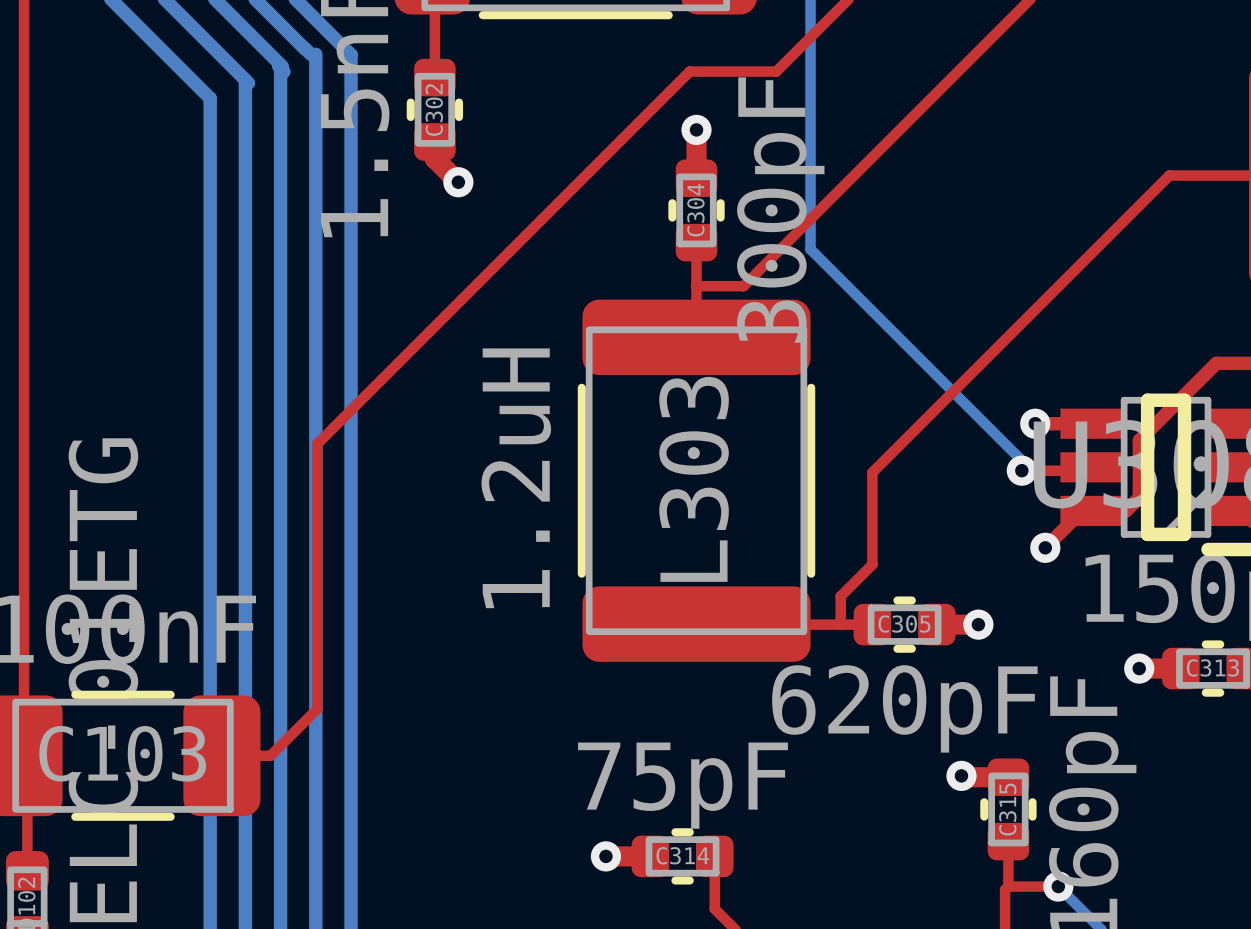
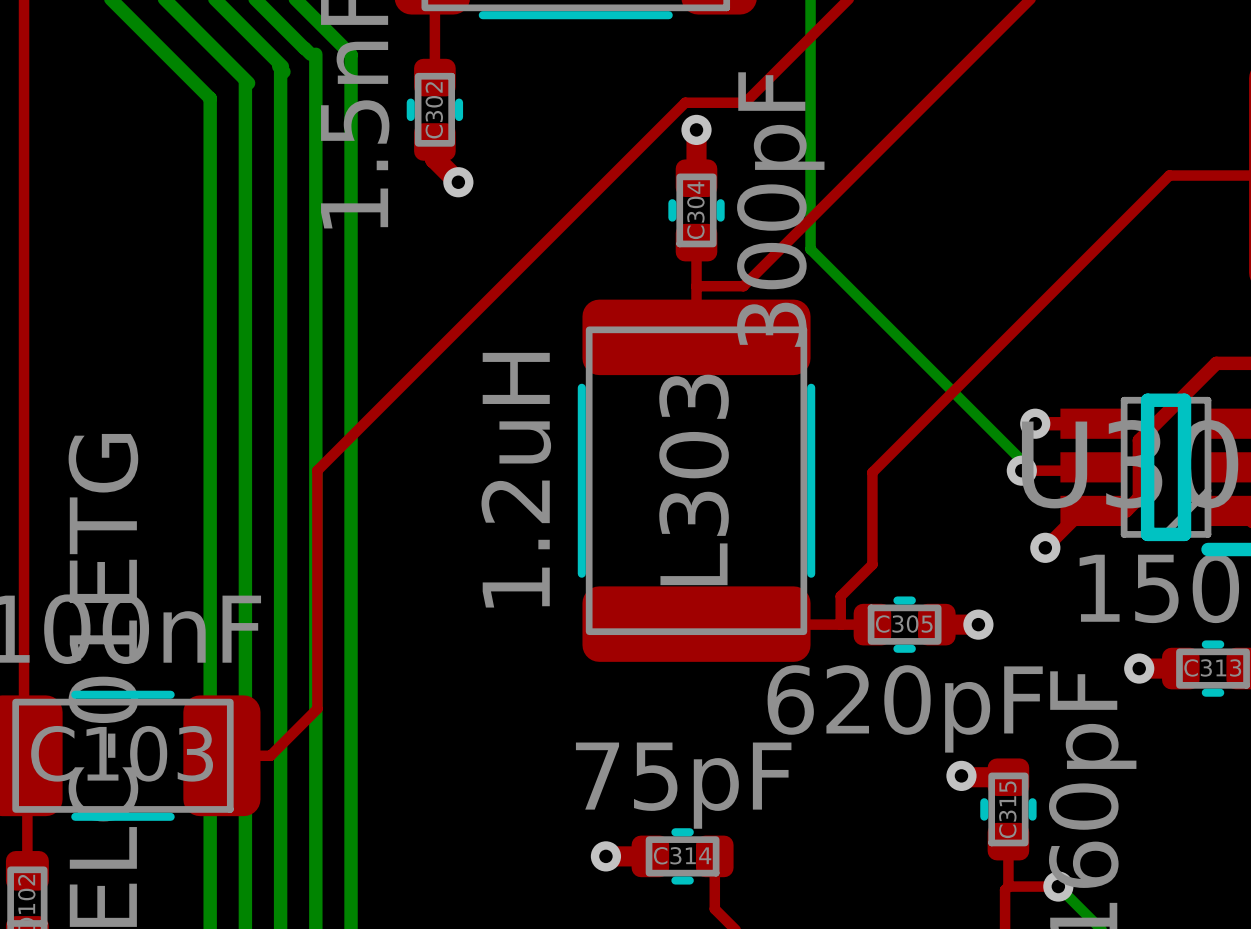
top track: (776, 71) (689, 71) (317, 443) (317, 470) -> (776, 71) (745, 102) (685, 102) (317, 470)

